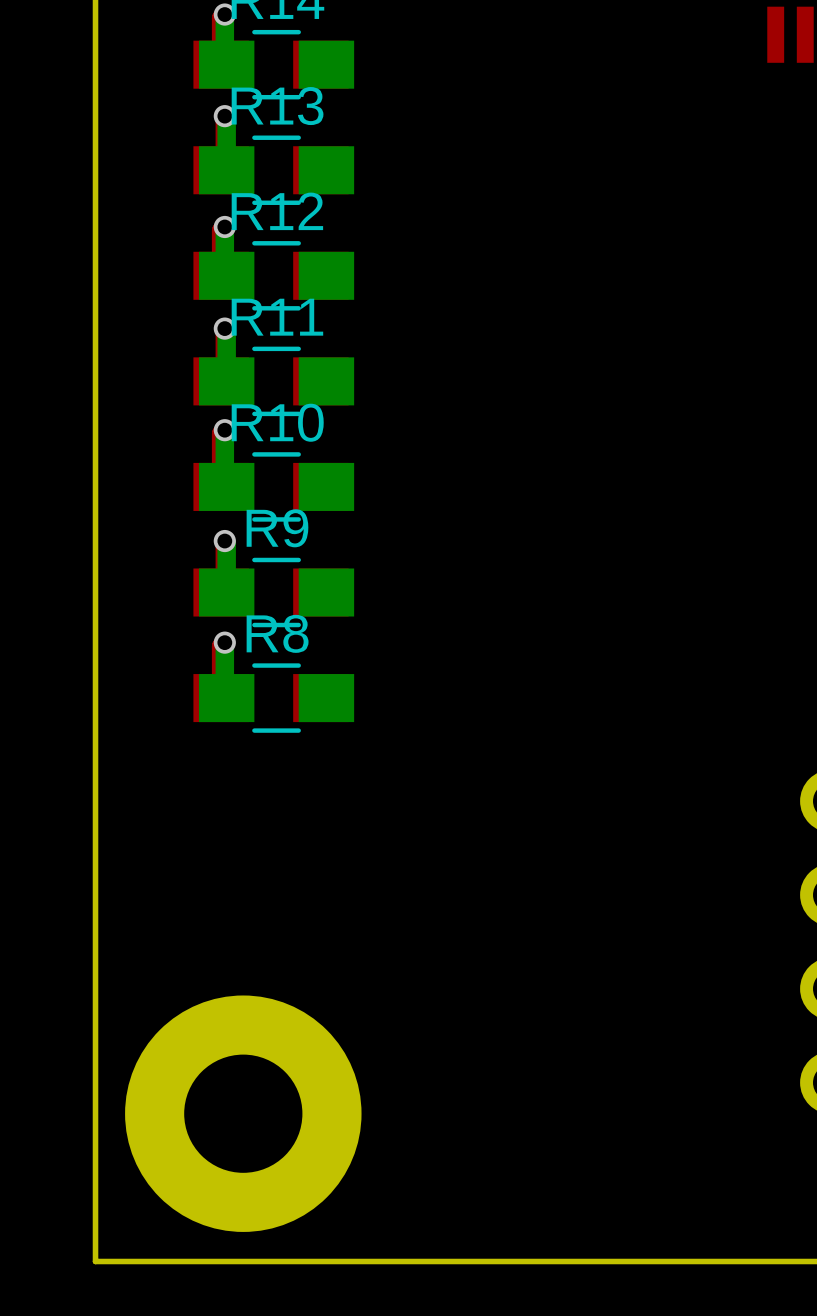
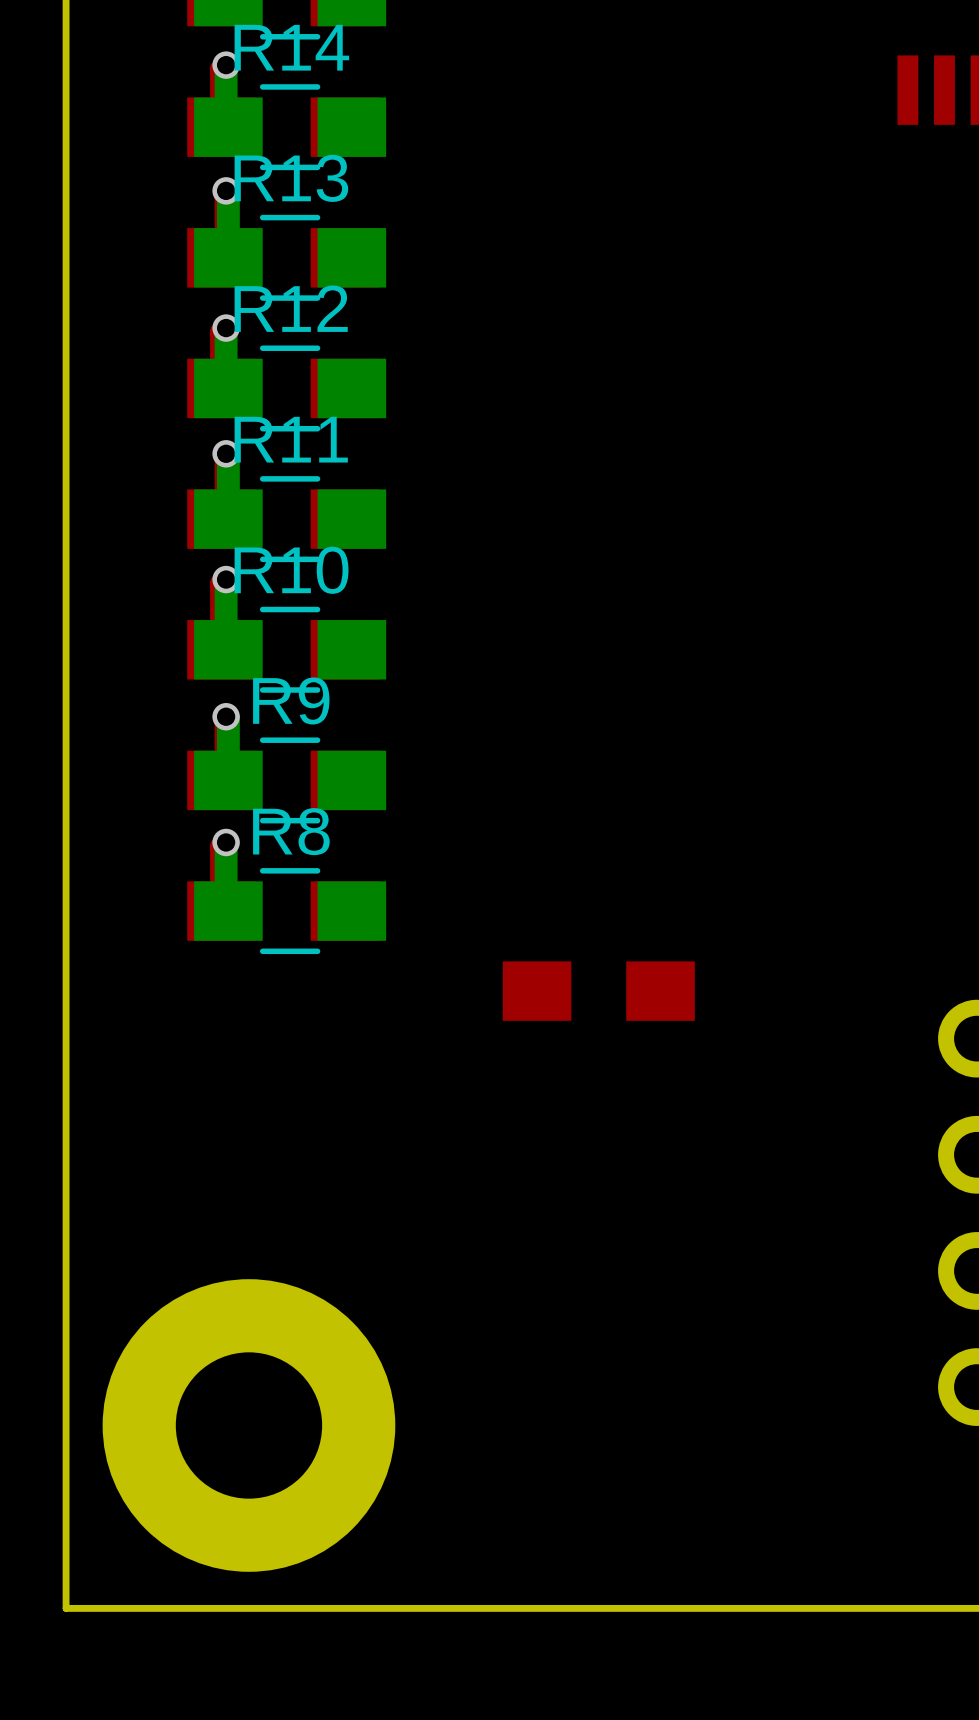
part: none -> (598, 991)

